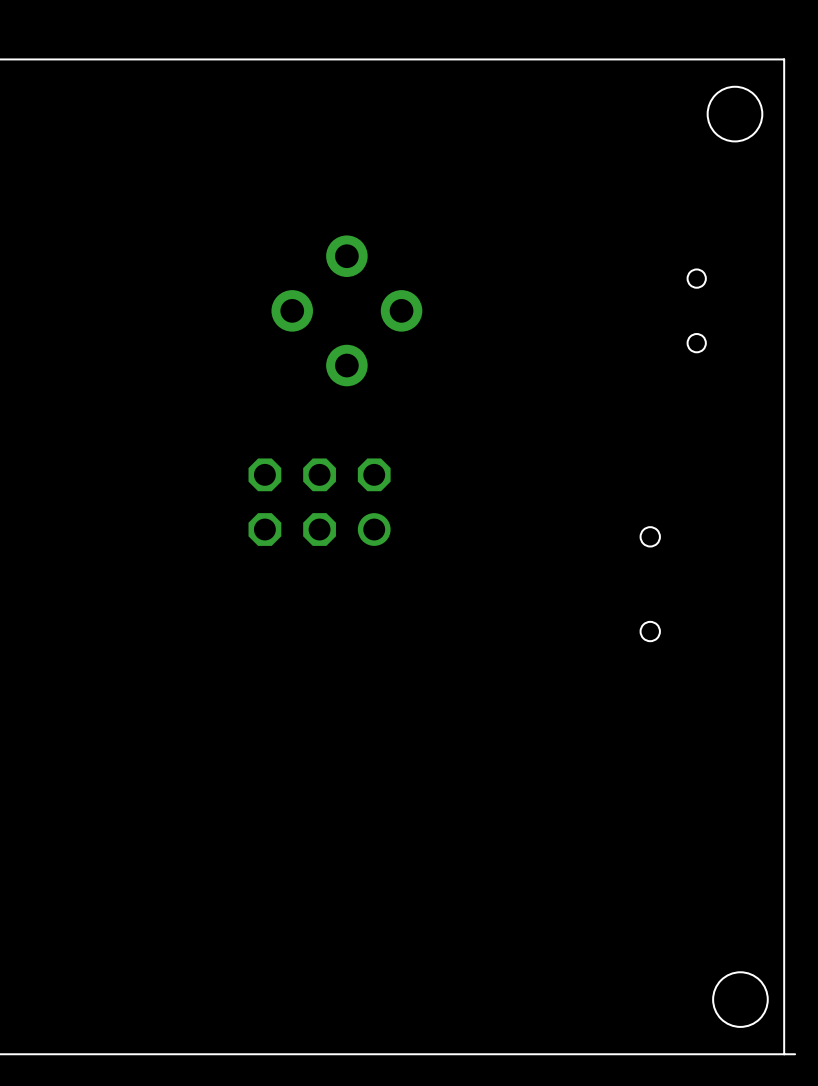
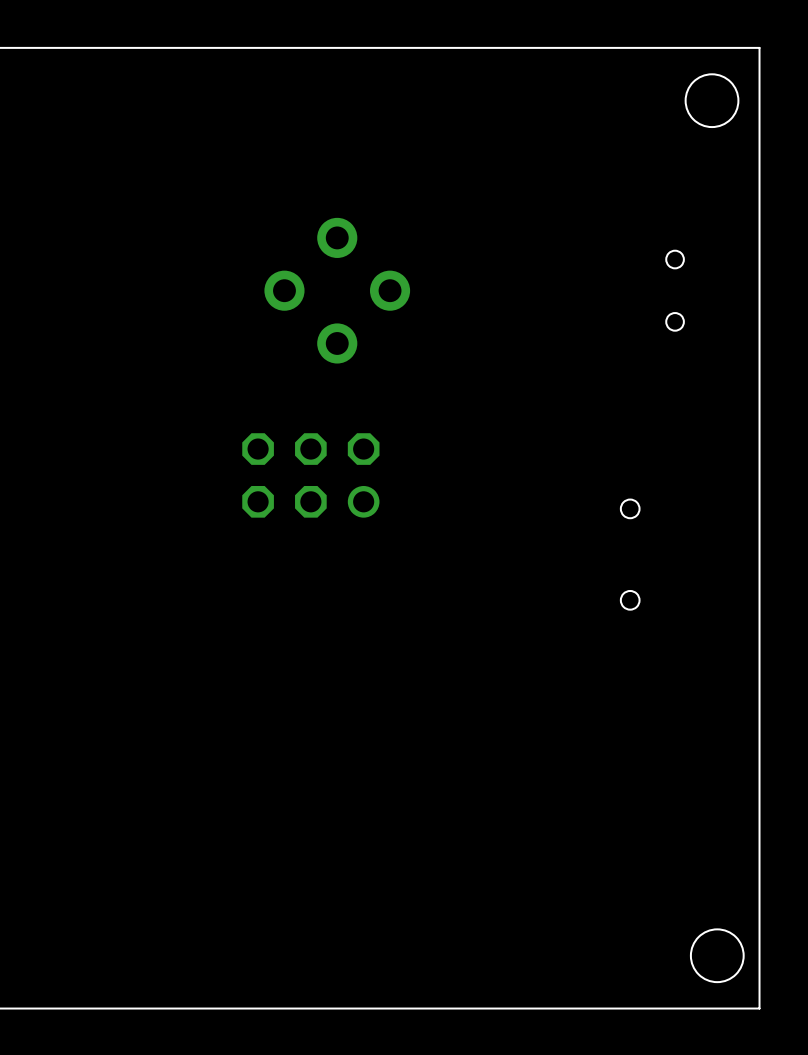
board edge: (795, 1054) (784, 1054) -> none

